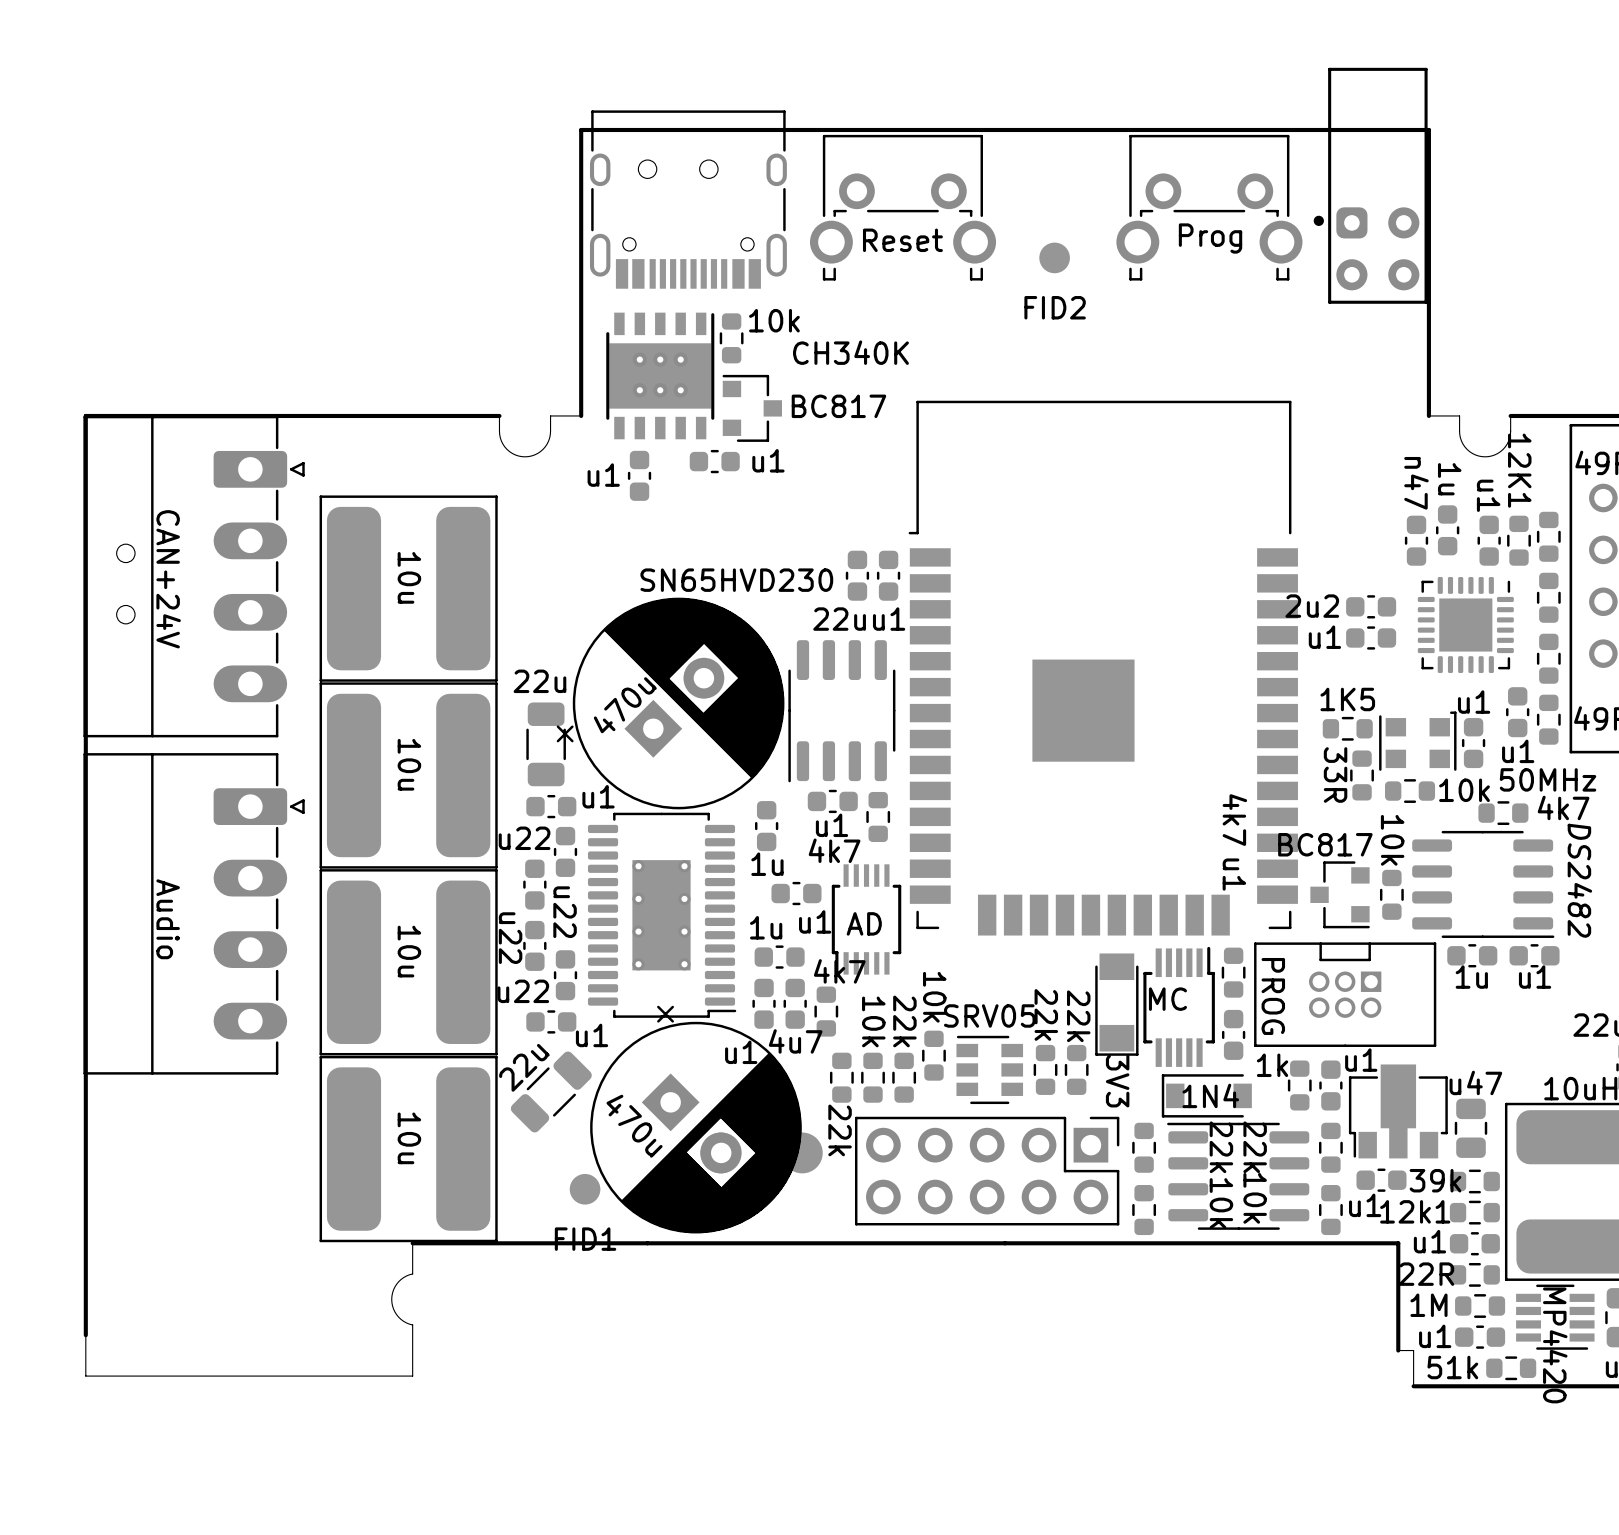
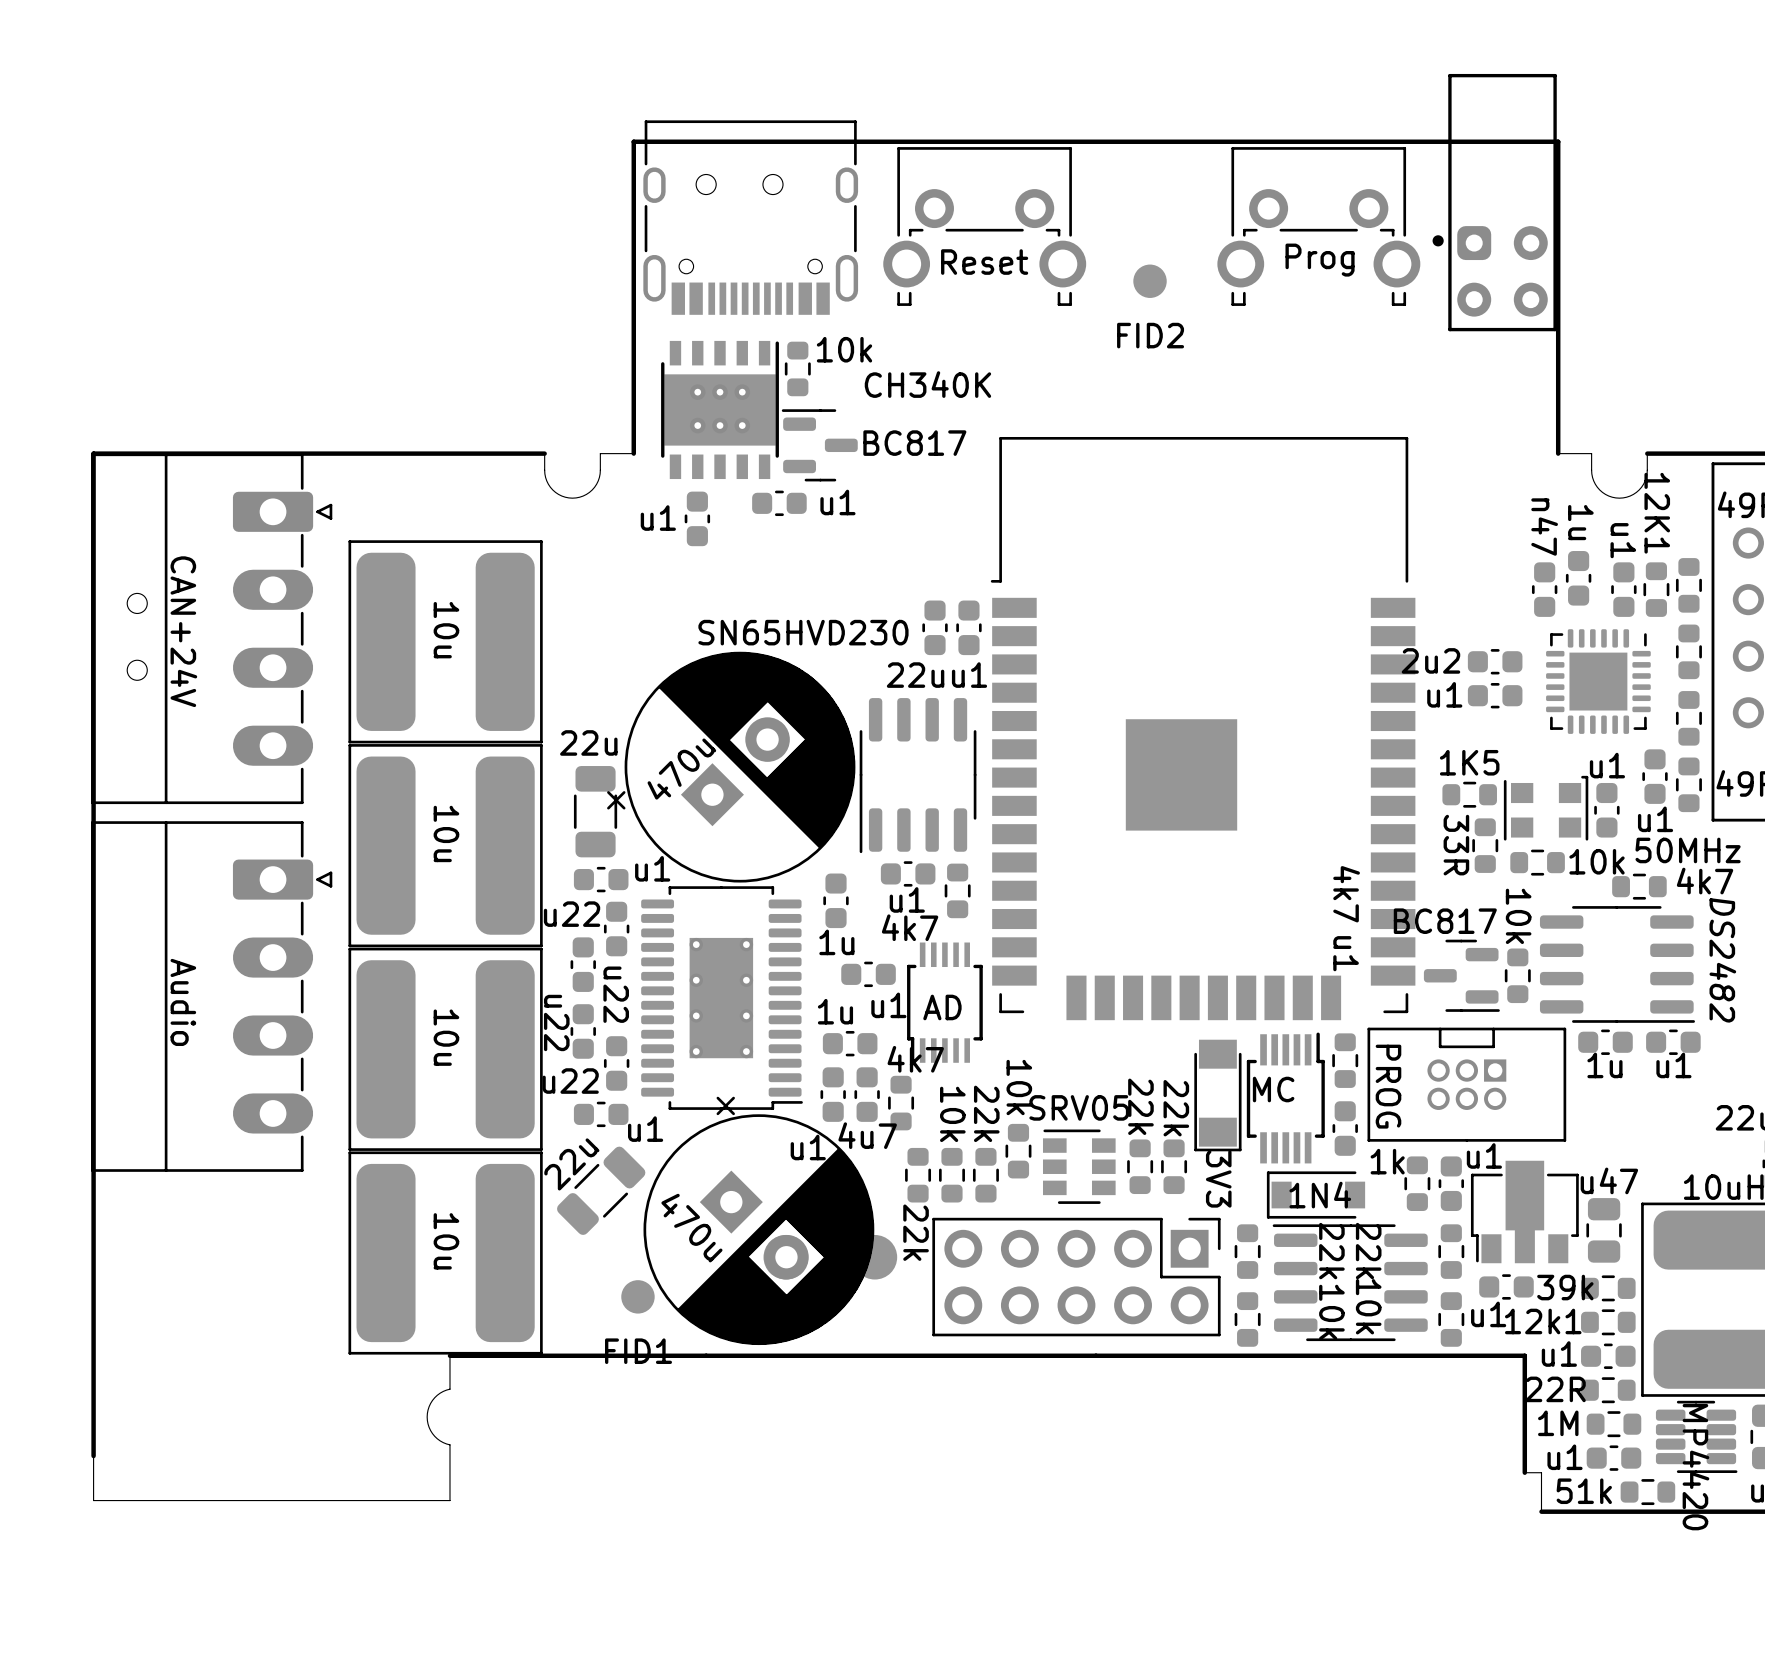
part footprint: [722, 374, 783, 442] -> [781, 409, 858, 482]
part footprint: [1310, 861, 1370, 929] -> [1423, 939, 1500, 1012]
part footprint: [1516, 1284, 1595, 1350] -> [1655, 1400, 1738, 1473]

